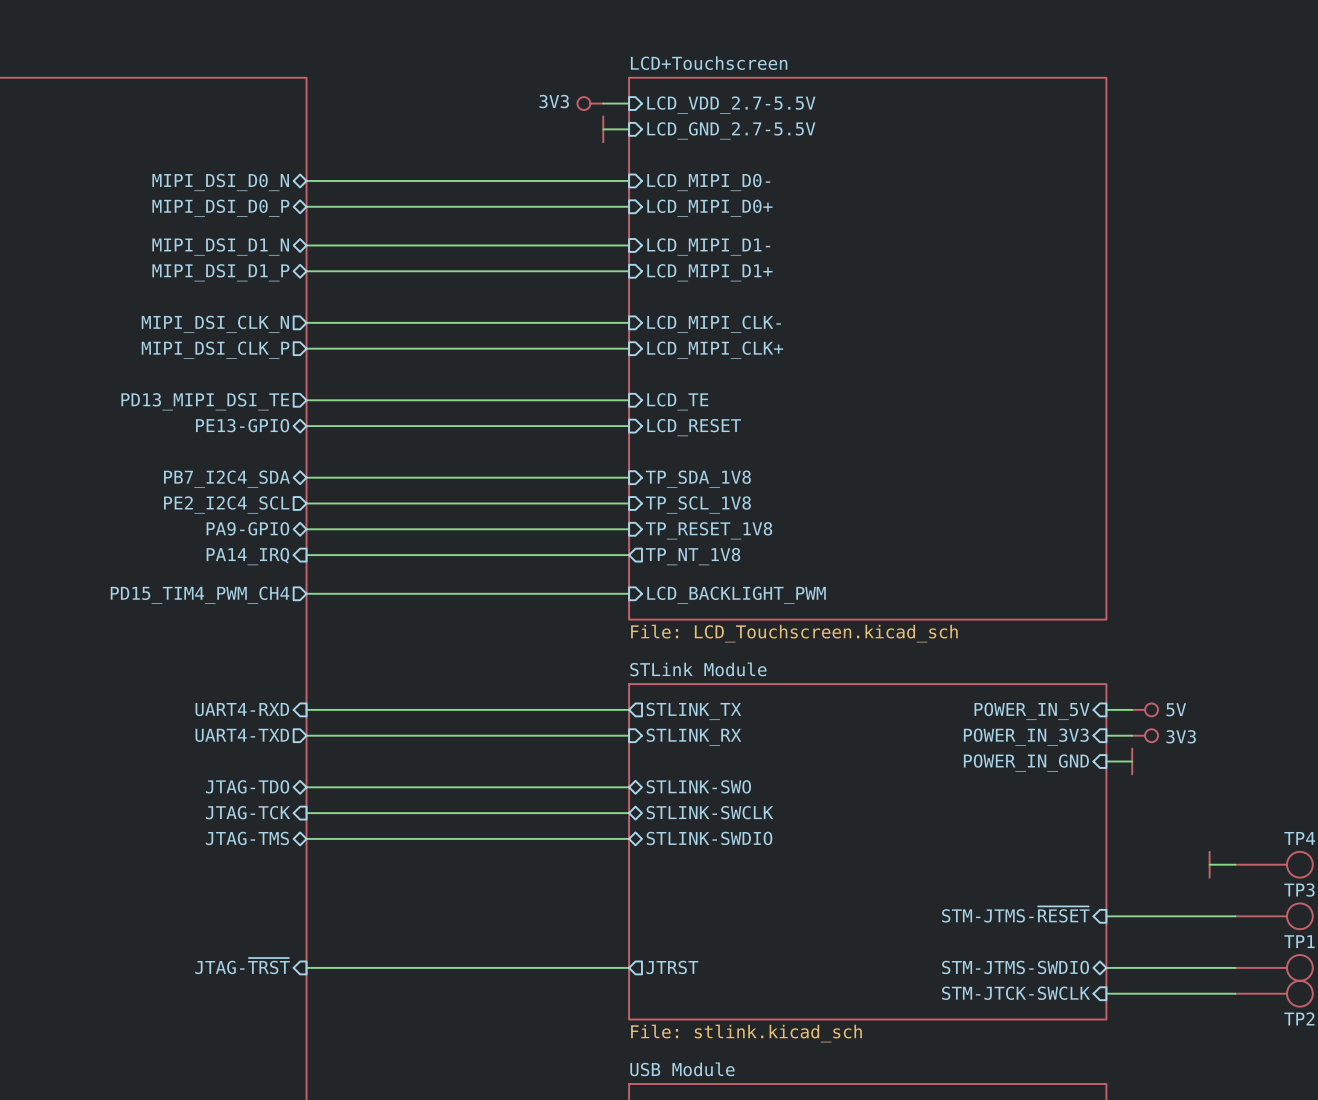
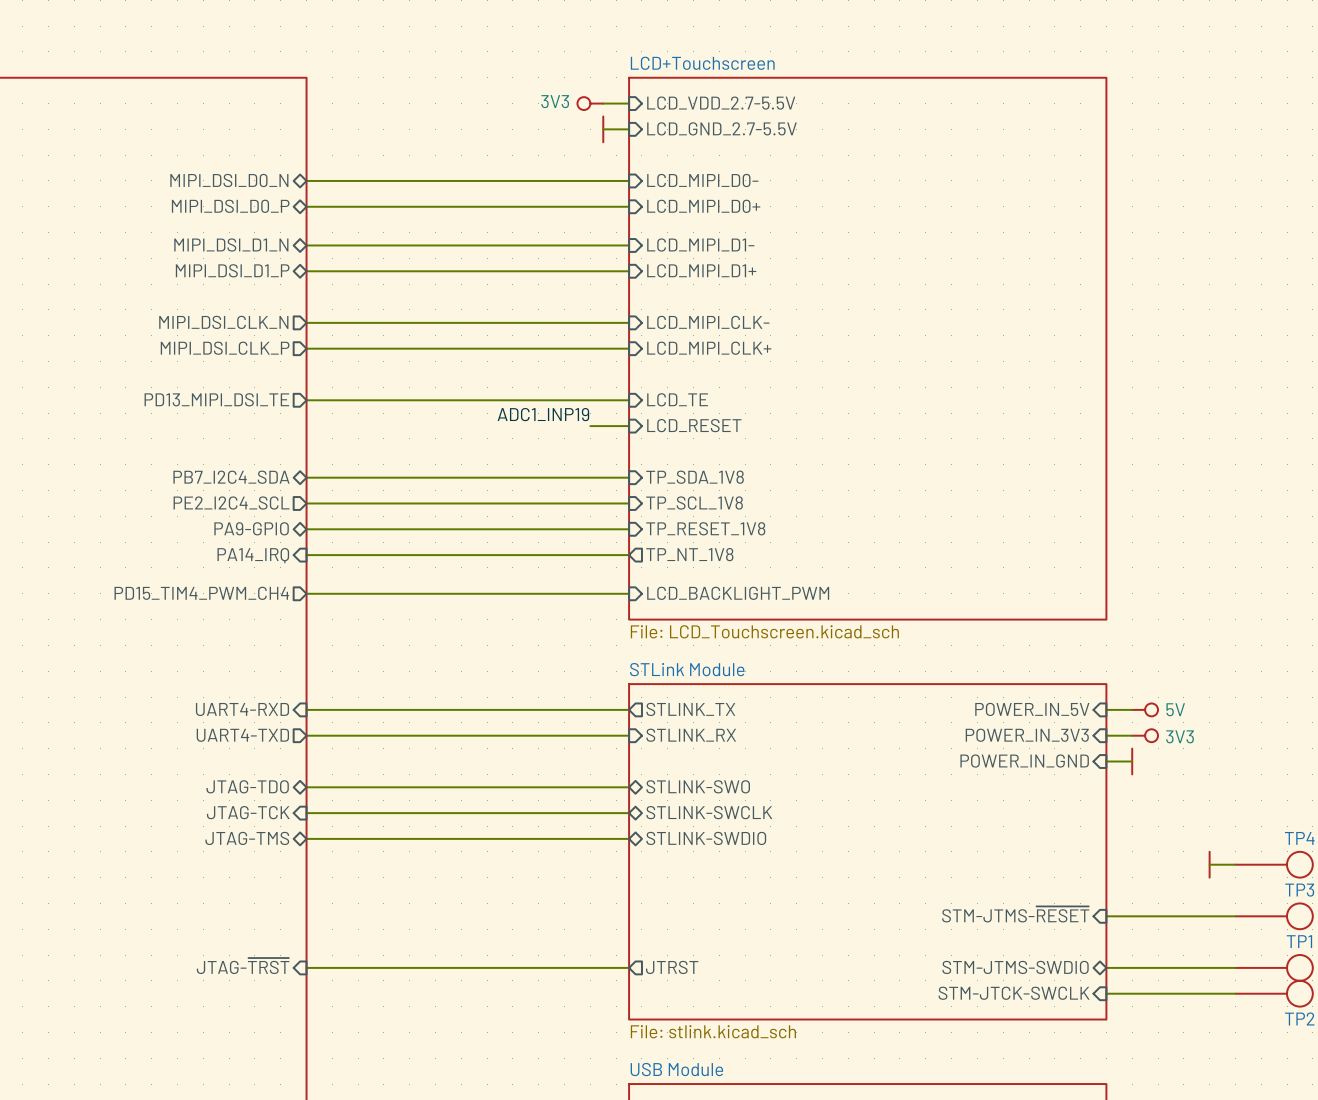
label: none -> ADC1_INP19 (543, 414)
sheet pin: PE13-GPIO (242, 425) -> none
wire: (306, 426) (590, 426) -> none

